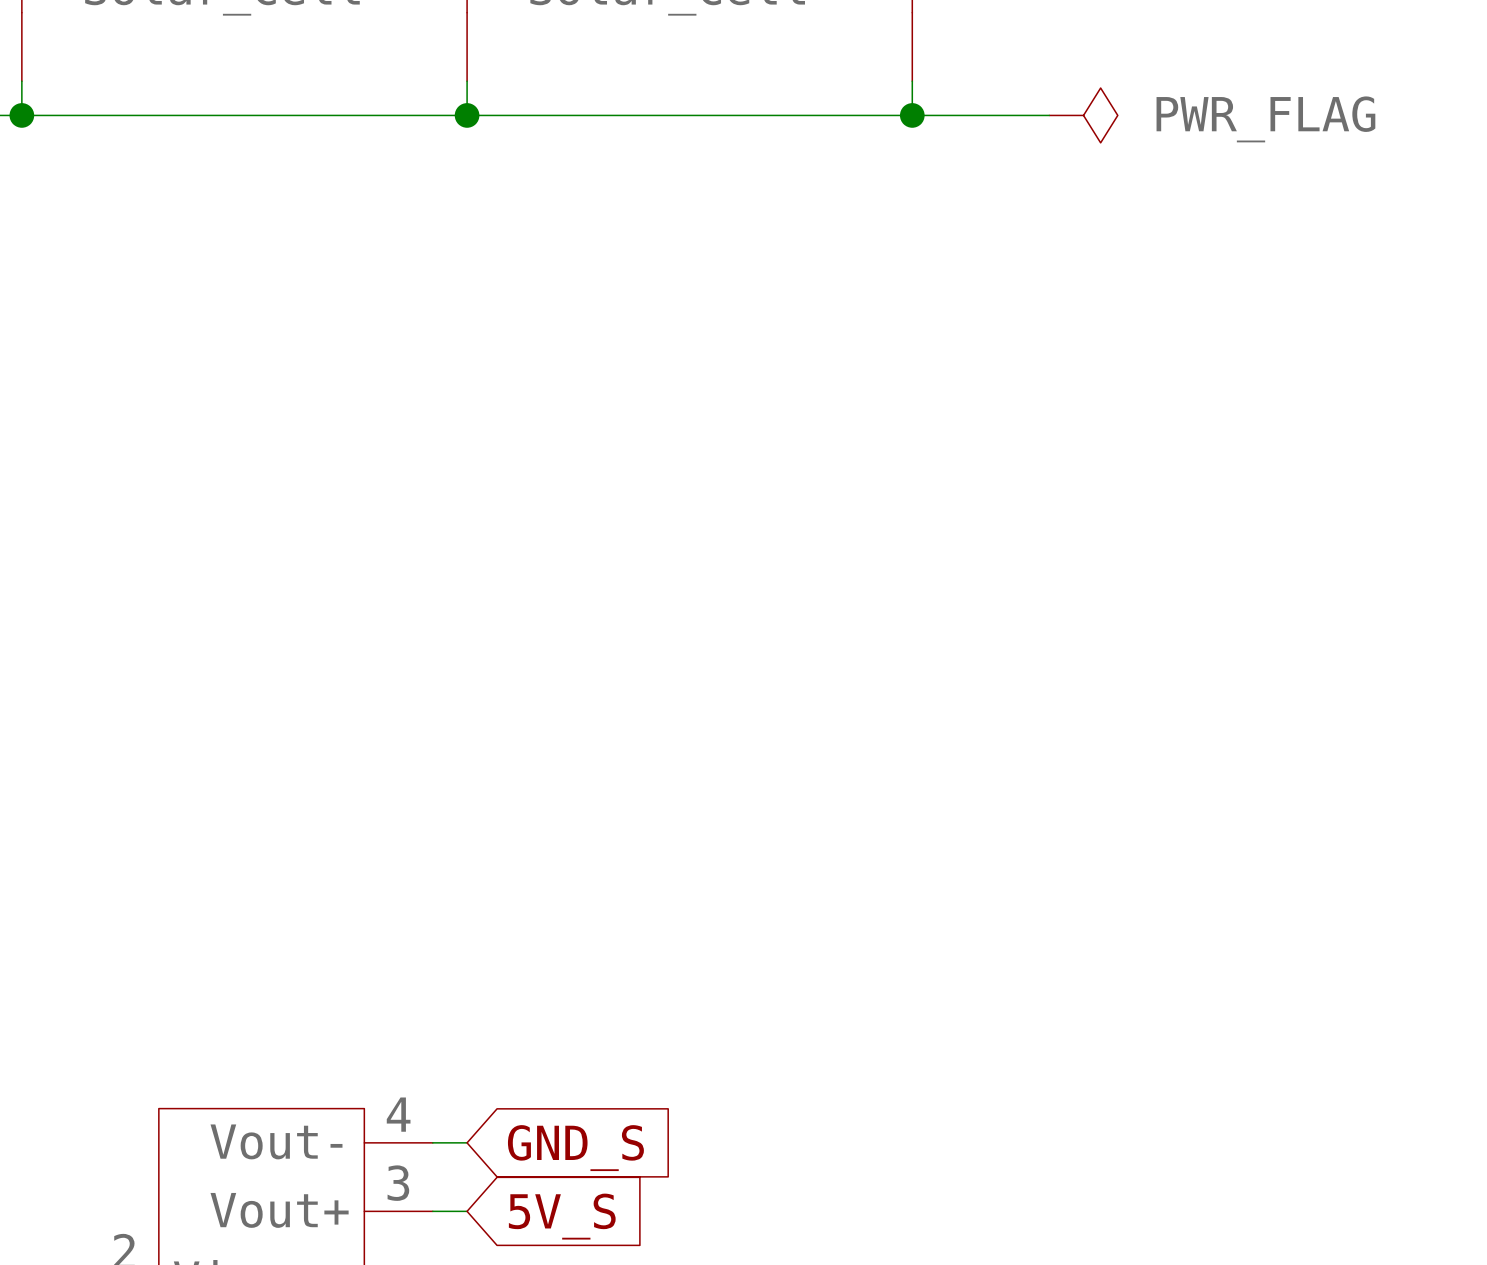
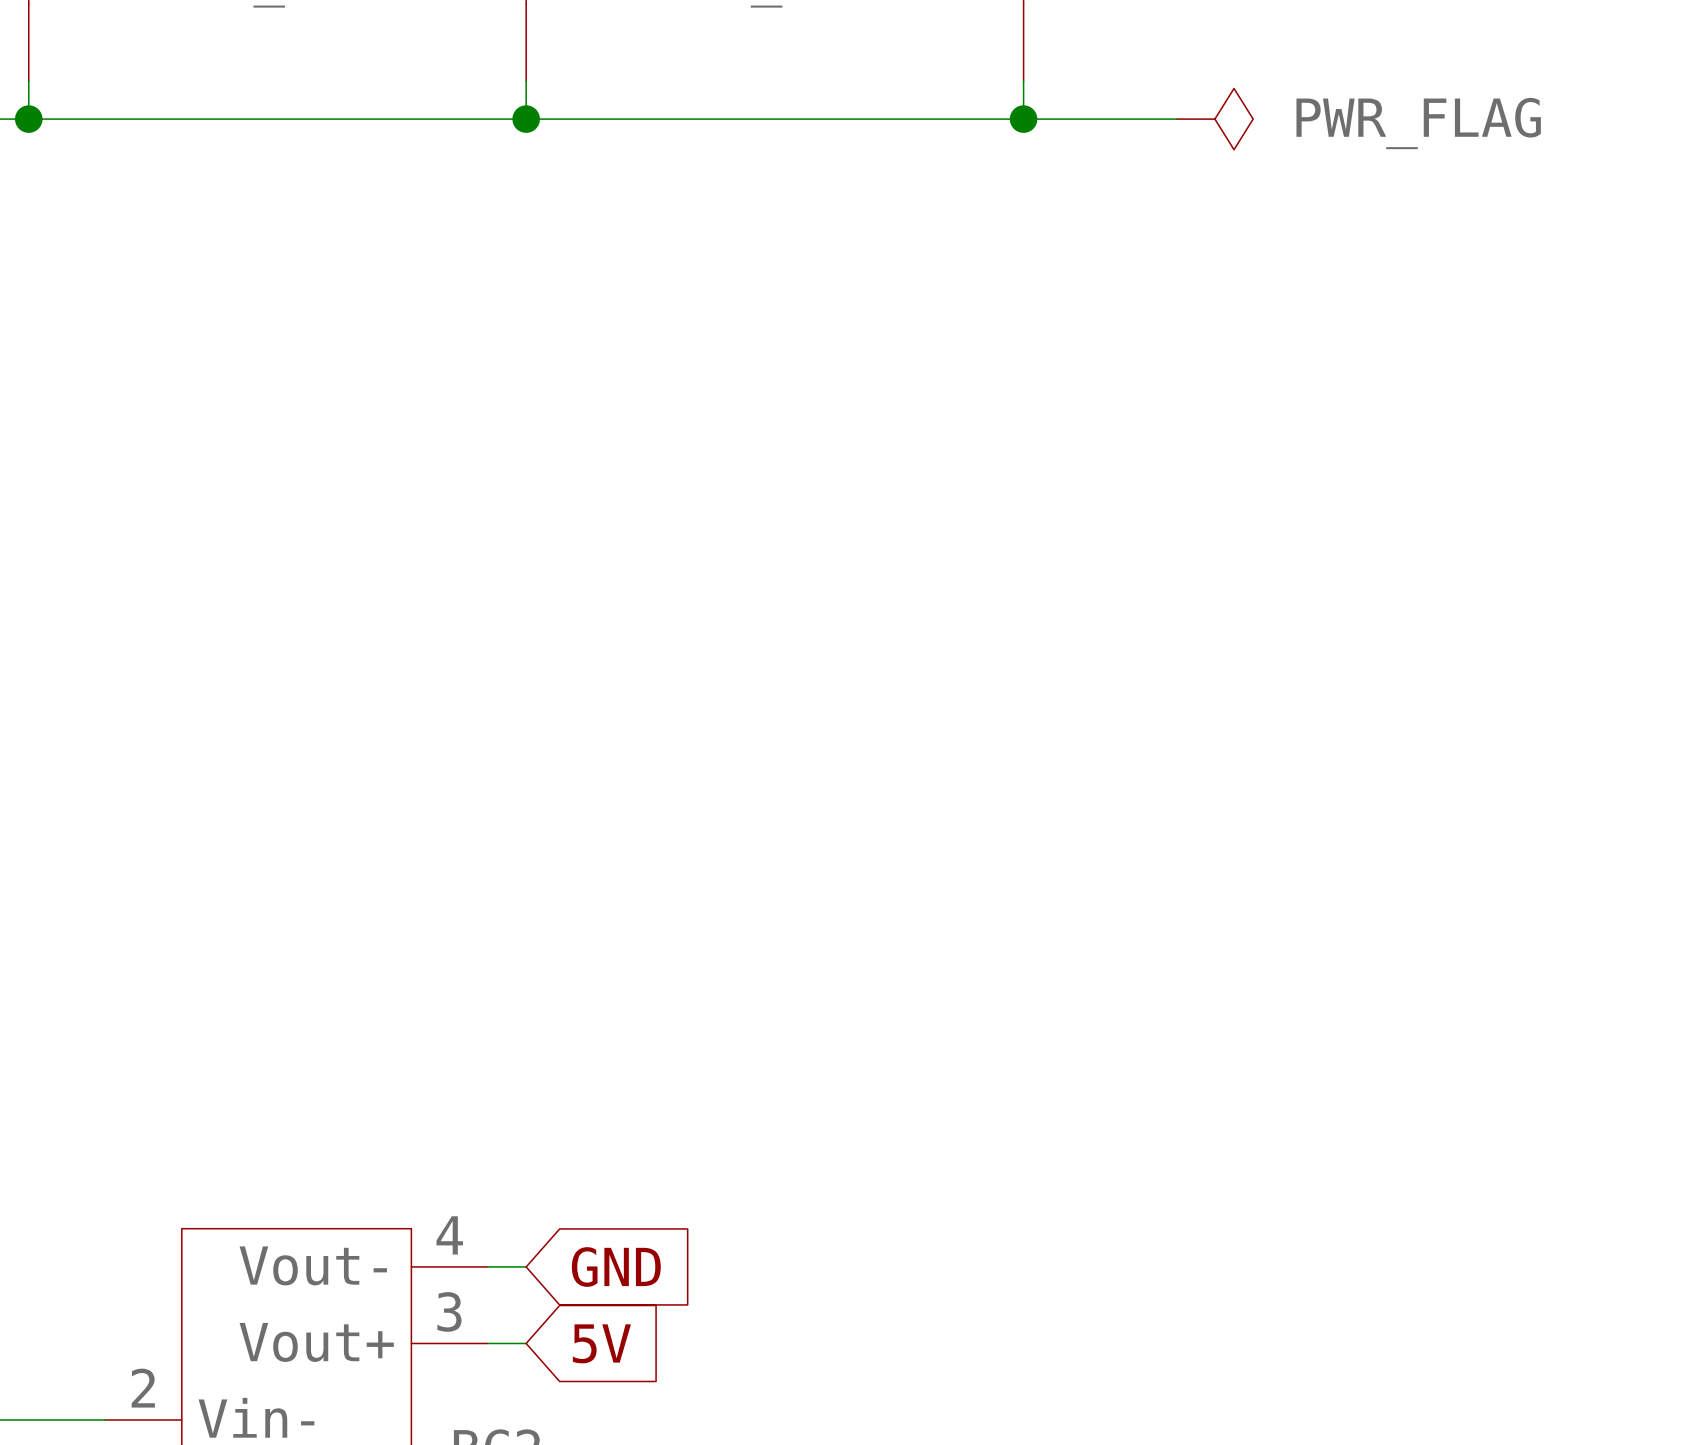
global label: GND_S (575, 1148) -> GND (616, 1266)
global label: 5V_S (562, 1216) -> 5V (601, 1343)

